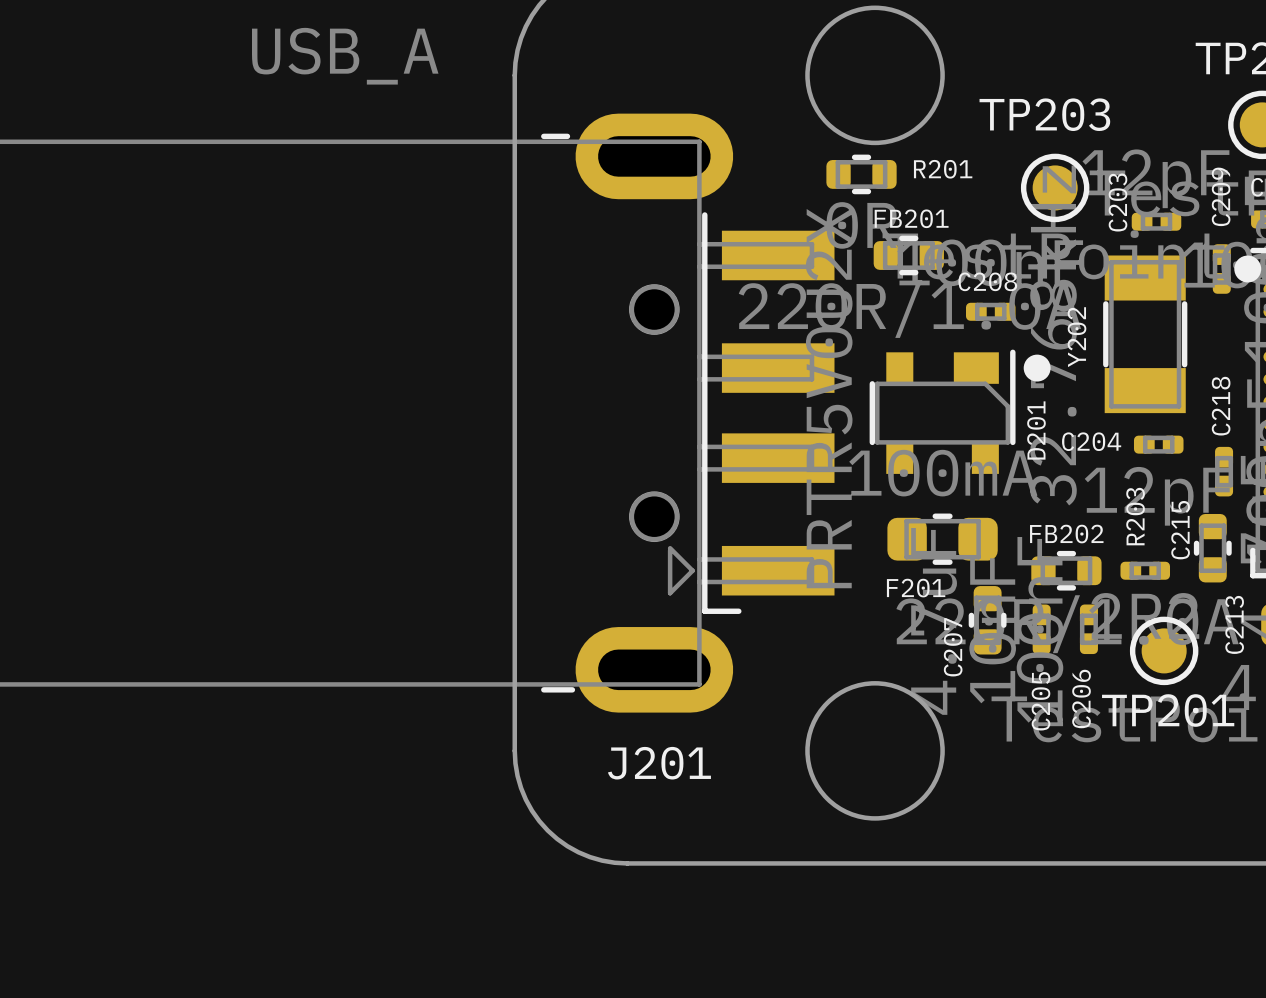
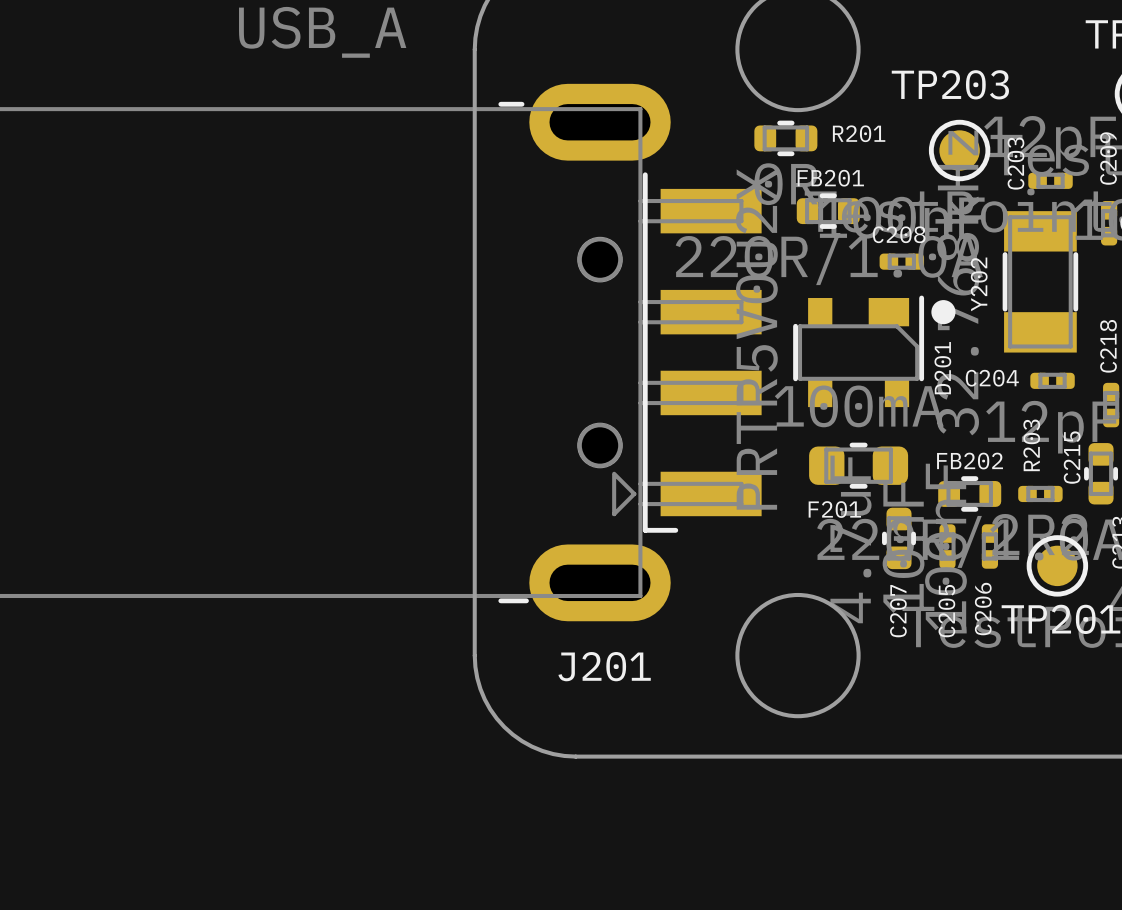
C207 name position: C207 (953, 647) -> C207 (898, 611)

